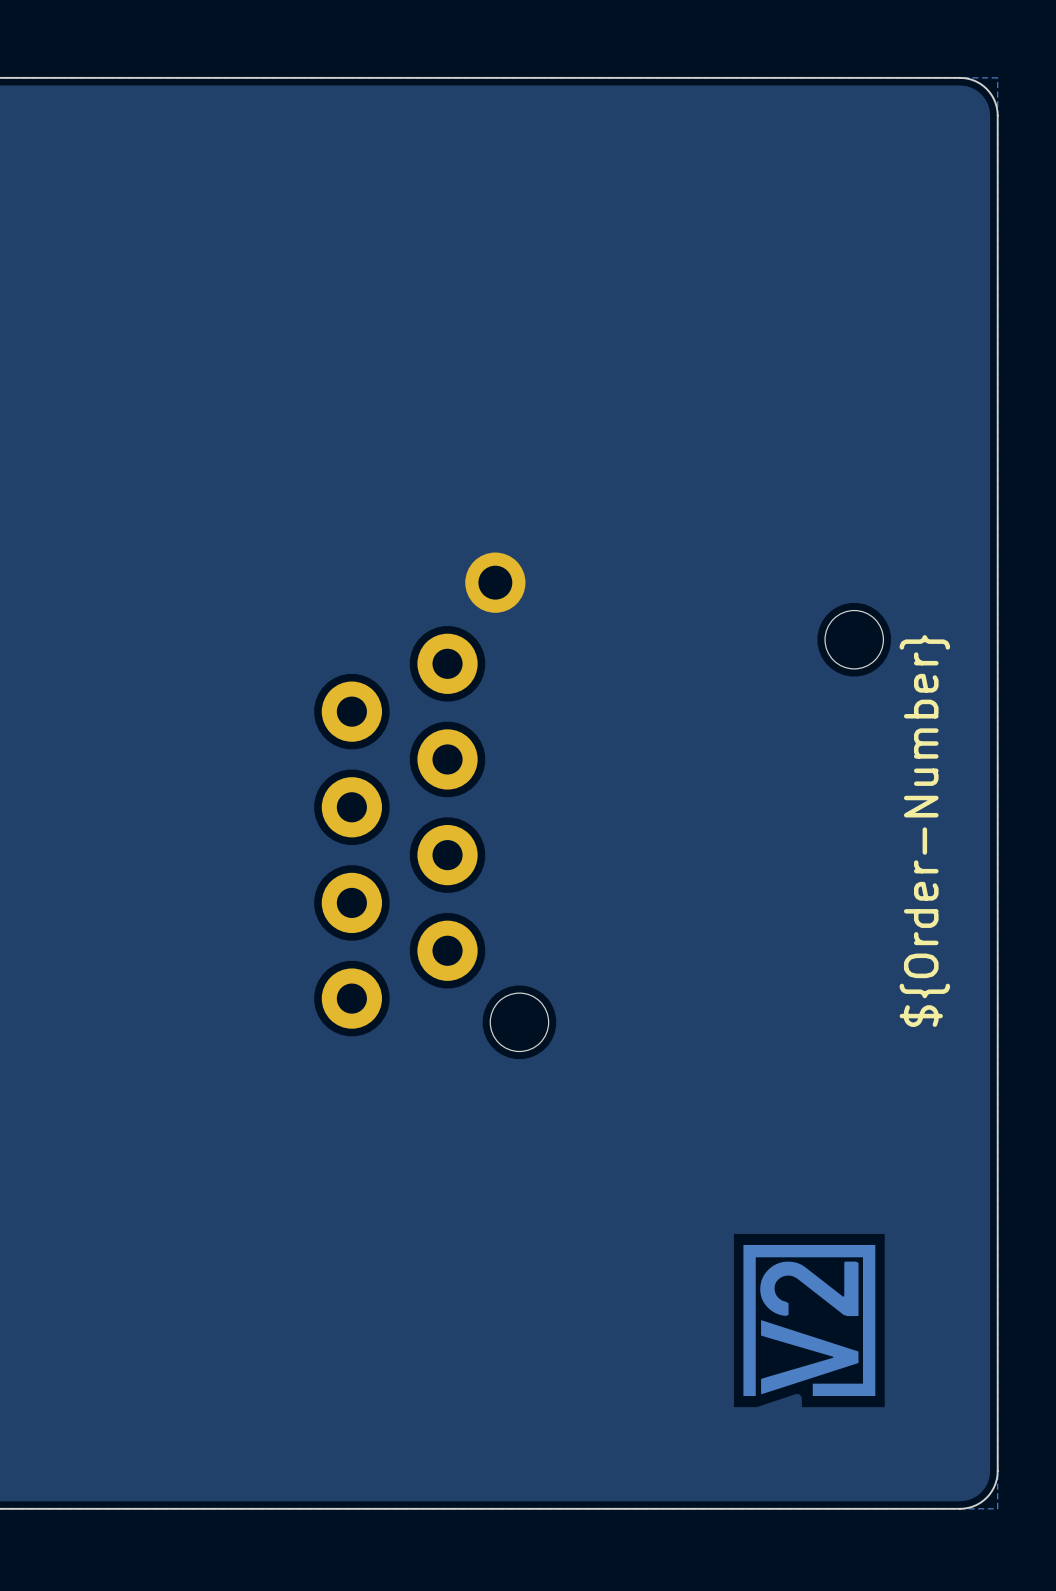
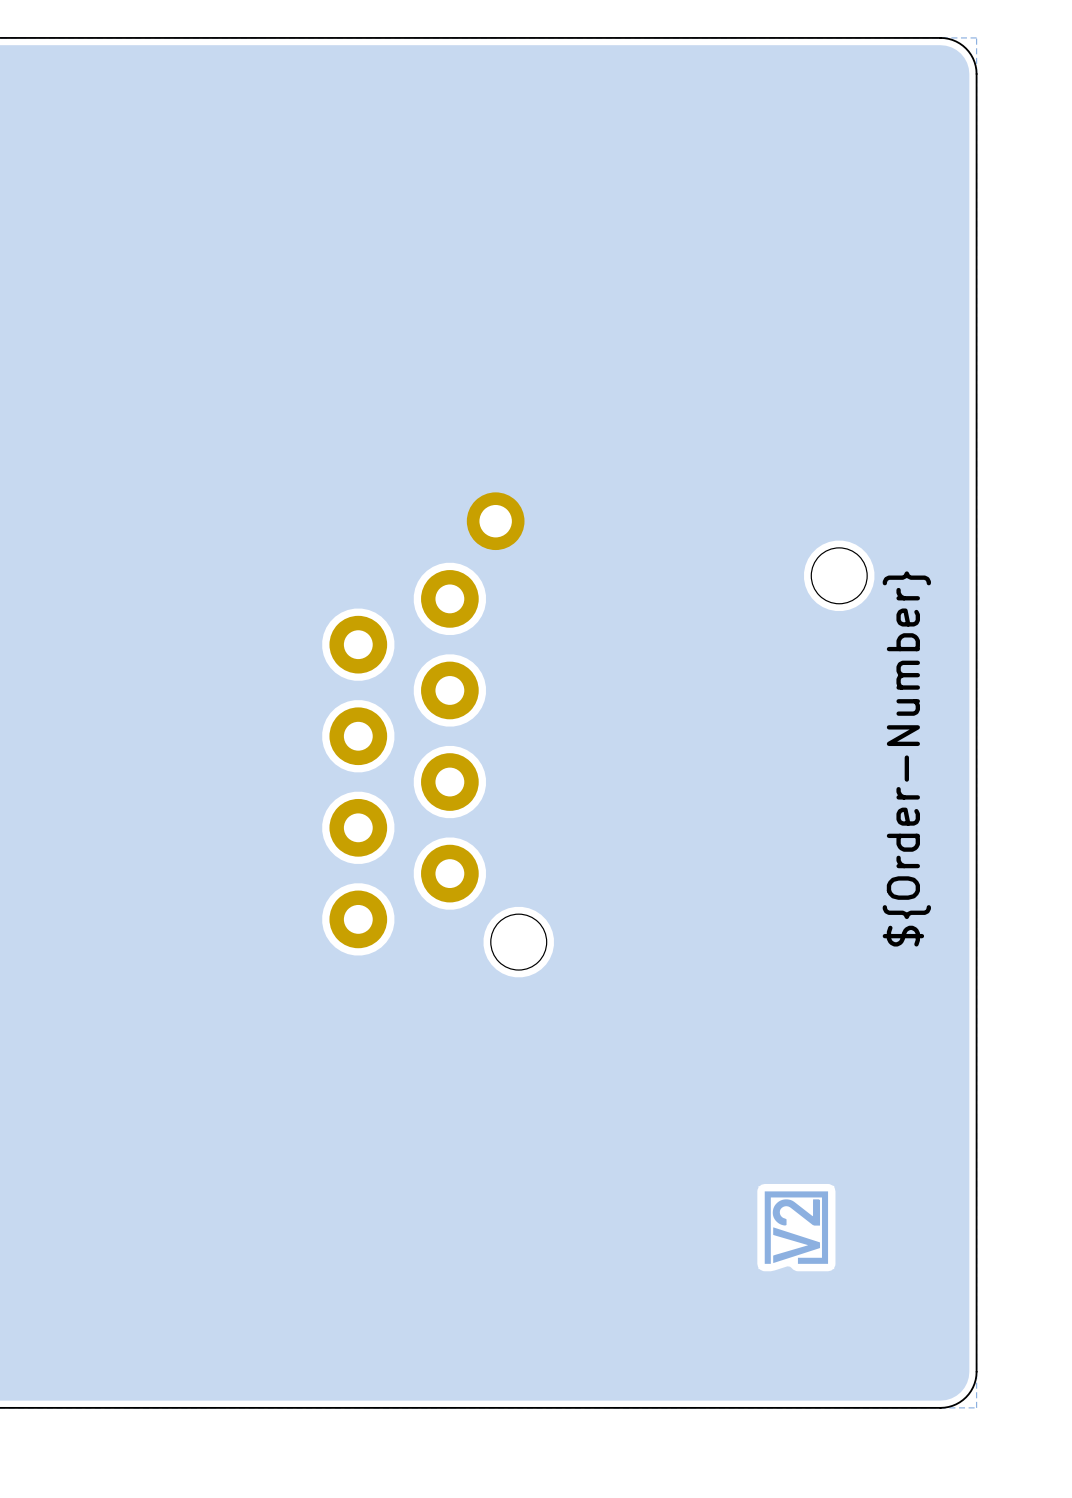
drawing shape: [743, 1244, 876, 1397] -> [764, 1191, 829, 1264]

